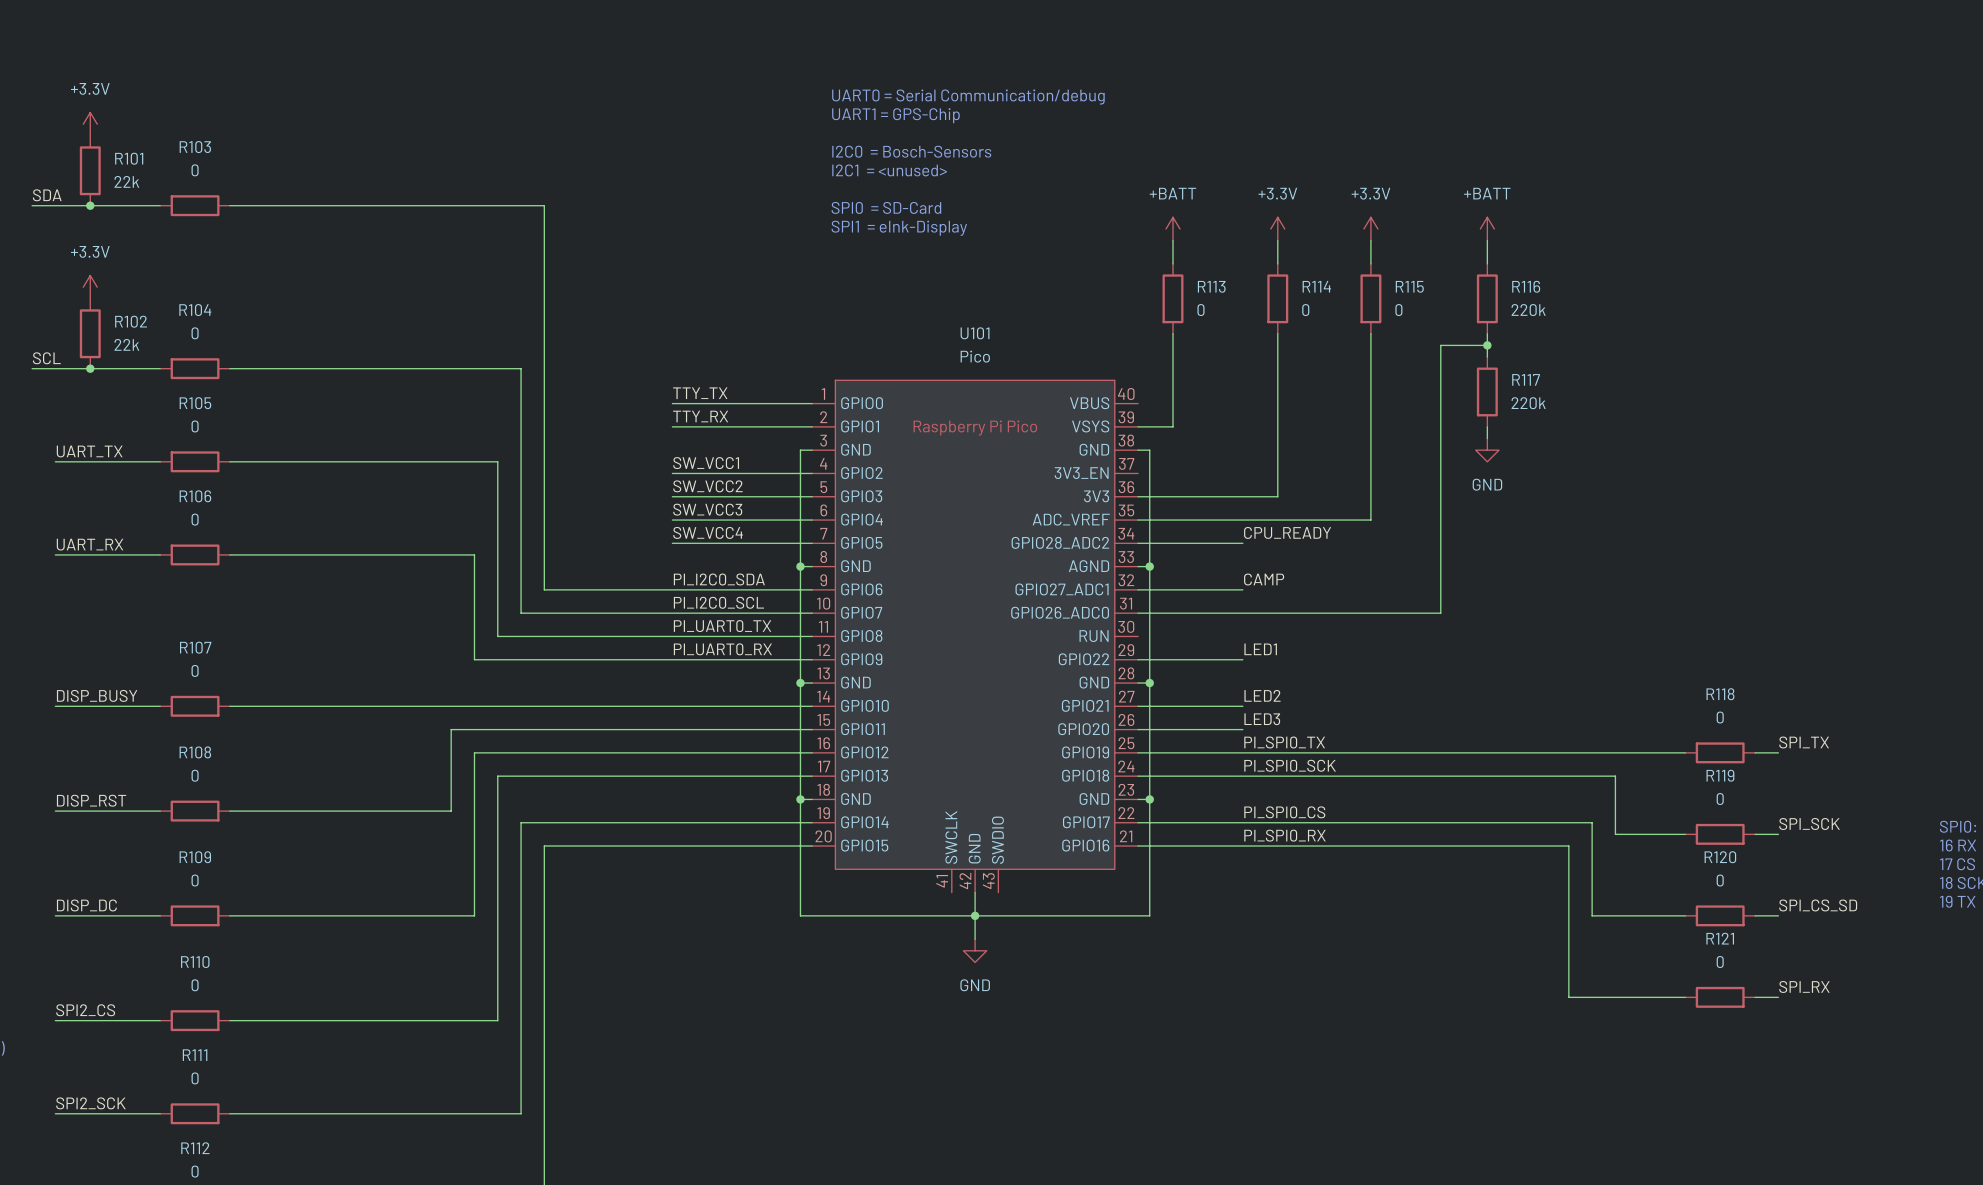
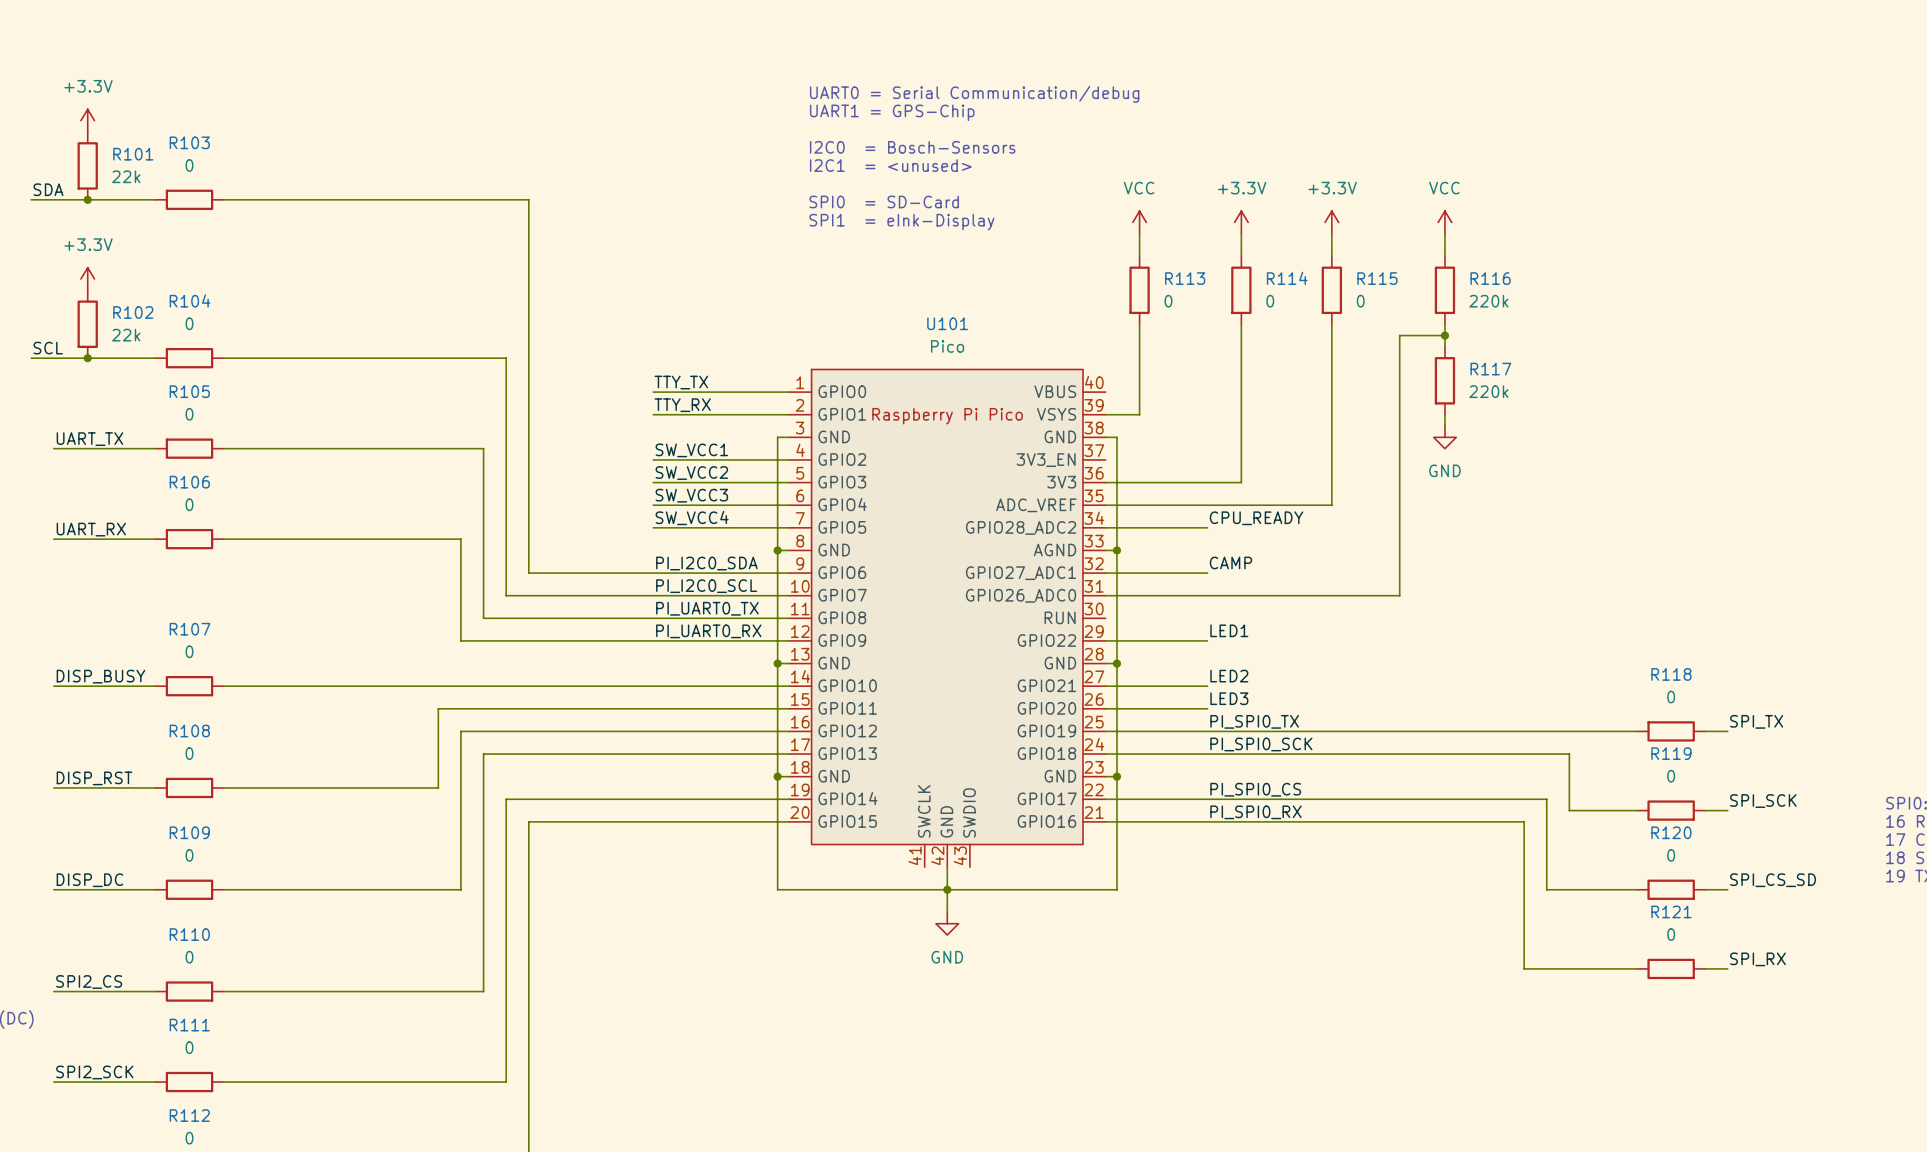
power symbol: +BATT (1173, 228) -> VCC (1139, 222)
power symbol: +BATT (1487, 228) -> VCC (1444, 222)

